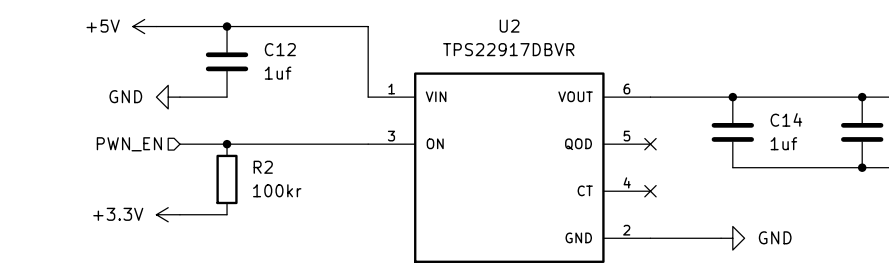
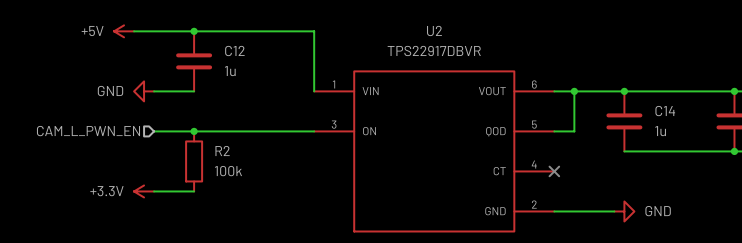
C12 value: 1uf (278, 73) -> 1u (230, 71)
wire: none -> (574, 91) (574, 131) (554, 131)
junction: none -> (574, 91)
C14 value: 1uf (783, 143) -> 1u (660, 131)
hierarchical label: PWN_EN (129, 144) -> CAM_L_PWN_EN (88, 131)
no-connect mark: (650, 144) -> none
R2 value: 100kr (277, 190) -> 100k (228, 171)

